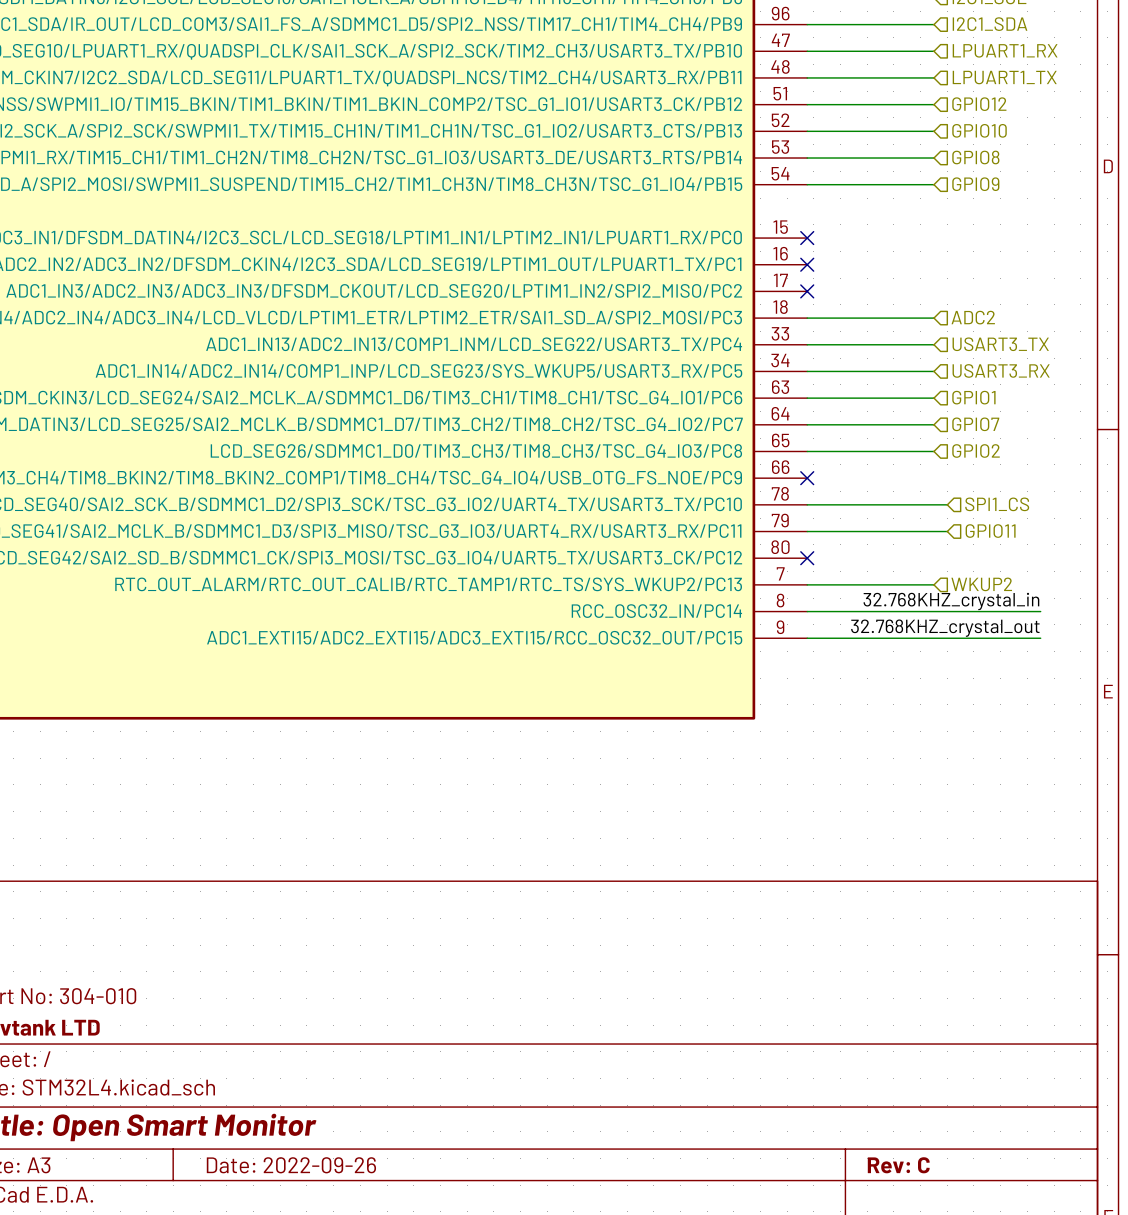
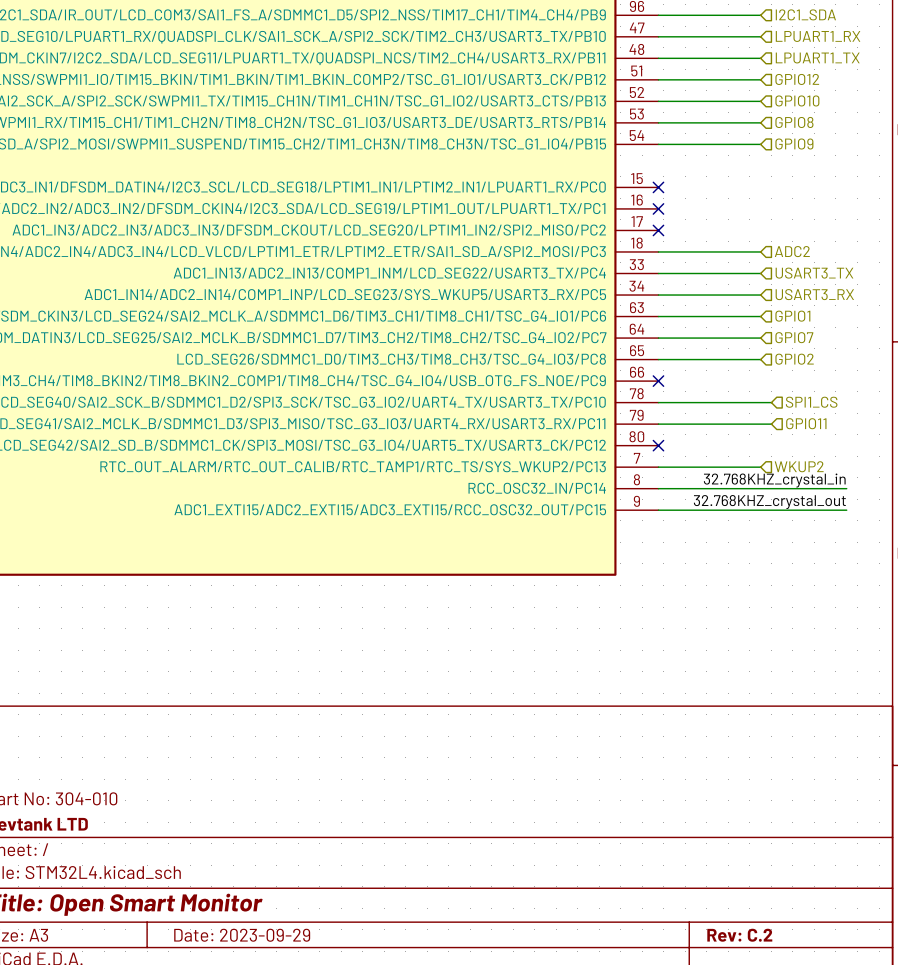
title block: Date: 2022-09-26 (291, 1165) -> Date: 2023-09-29 (242, 935)
title block: Rev: C (898, 1165) -> Rev: C.2 (739, 935)

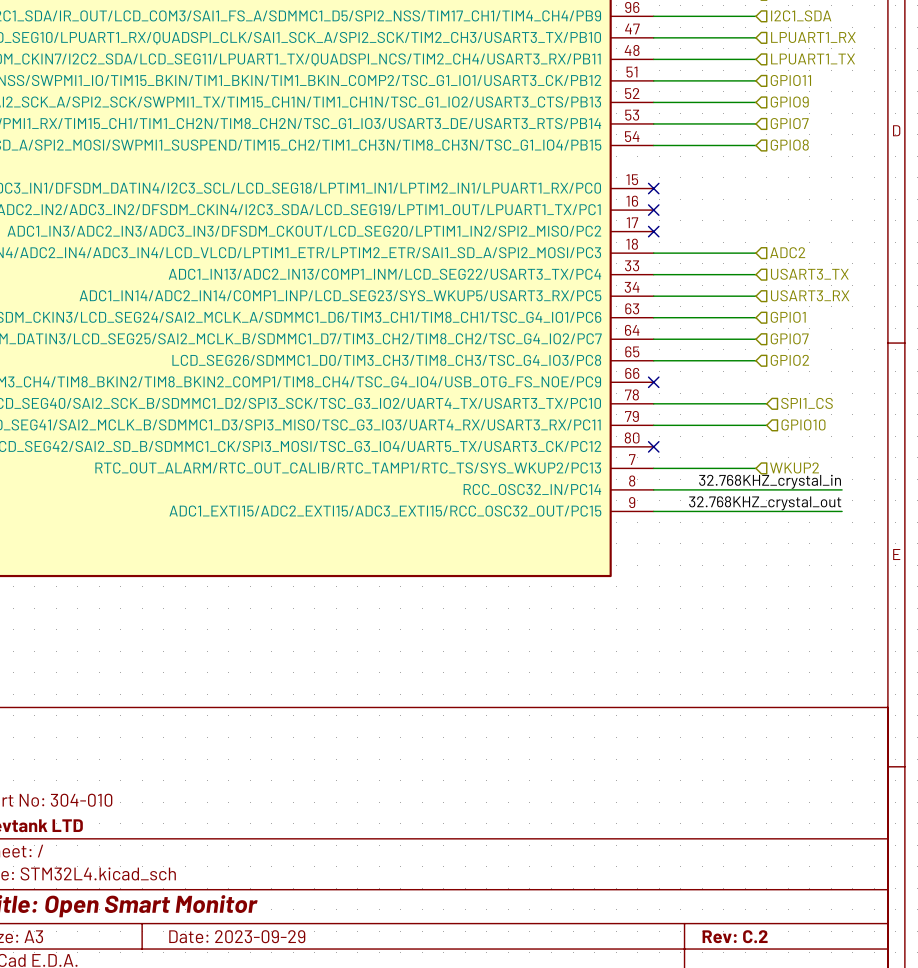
hierarchical label: GPIO12 (797, 79) -> GPIO11 (790, 80)
hierarchical label: GPIO10 (797, 100) -> GPIO9 (789, 102)
hierarchical label: GPIO8 (794, 122) -> GPIO7 (789, 123)
hierarchical label: GPIO9 (794, 144) -> GPIO8 (789, 145)
hierarchical label: GPIO11 (806, 423) -> GPIO10 (803, 424)

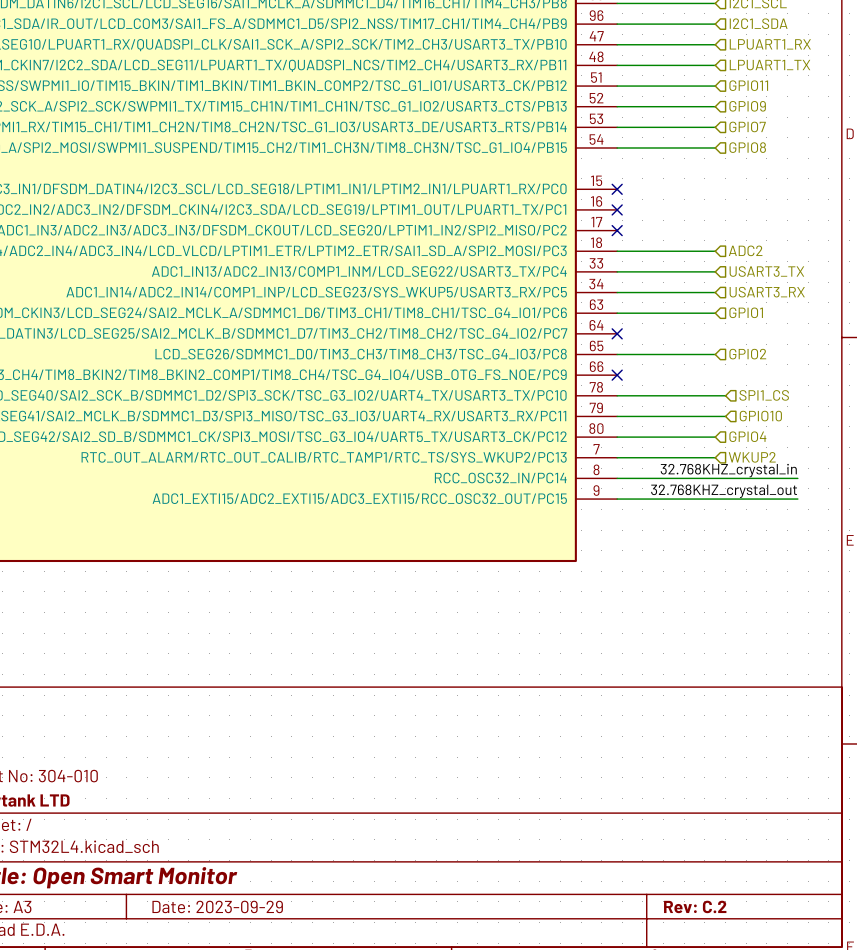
hierarchical label: GPIO7 (789, 338) -> none
wire: (653, 339) (755, 339) -> (617, 437) (715, 437)
no-connect mark: none -> (617, 333)
no-connect mark: (653, 446) -> none
hierarchical label: none -> GPIO4 (747, 436)

